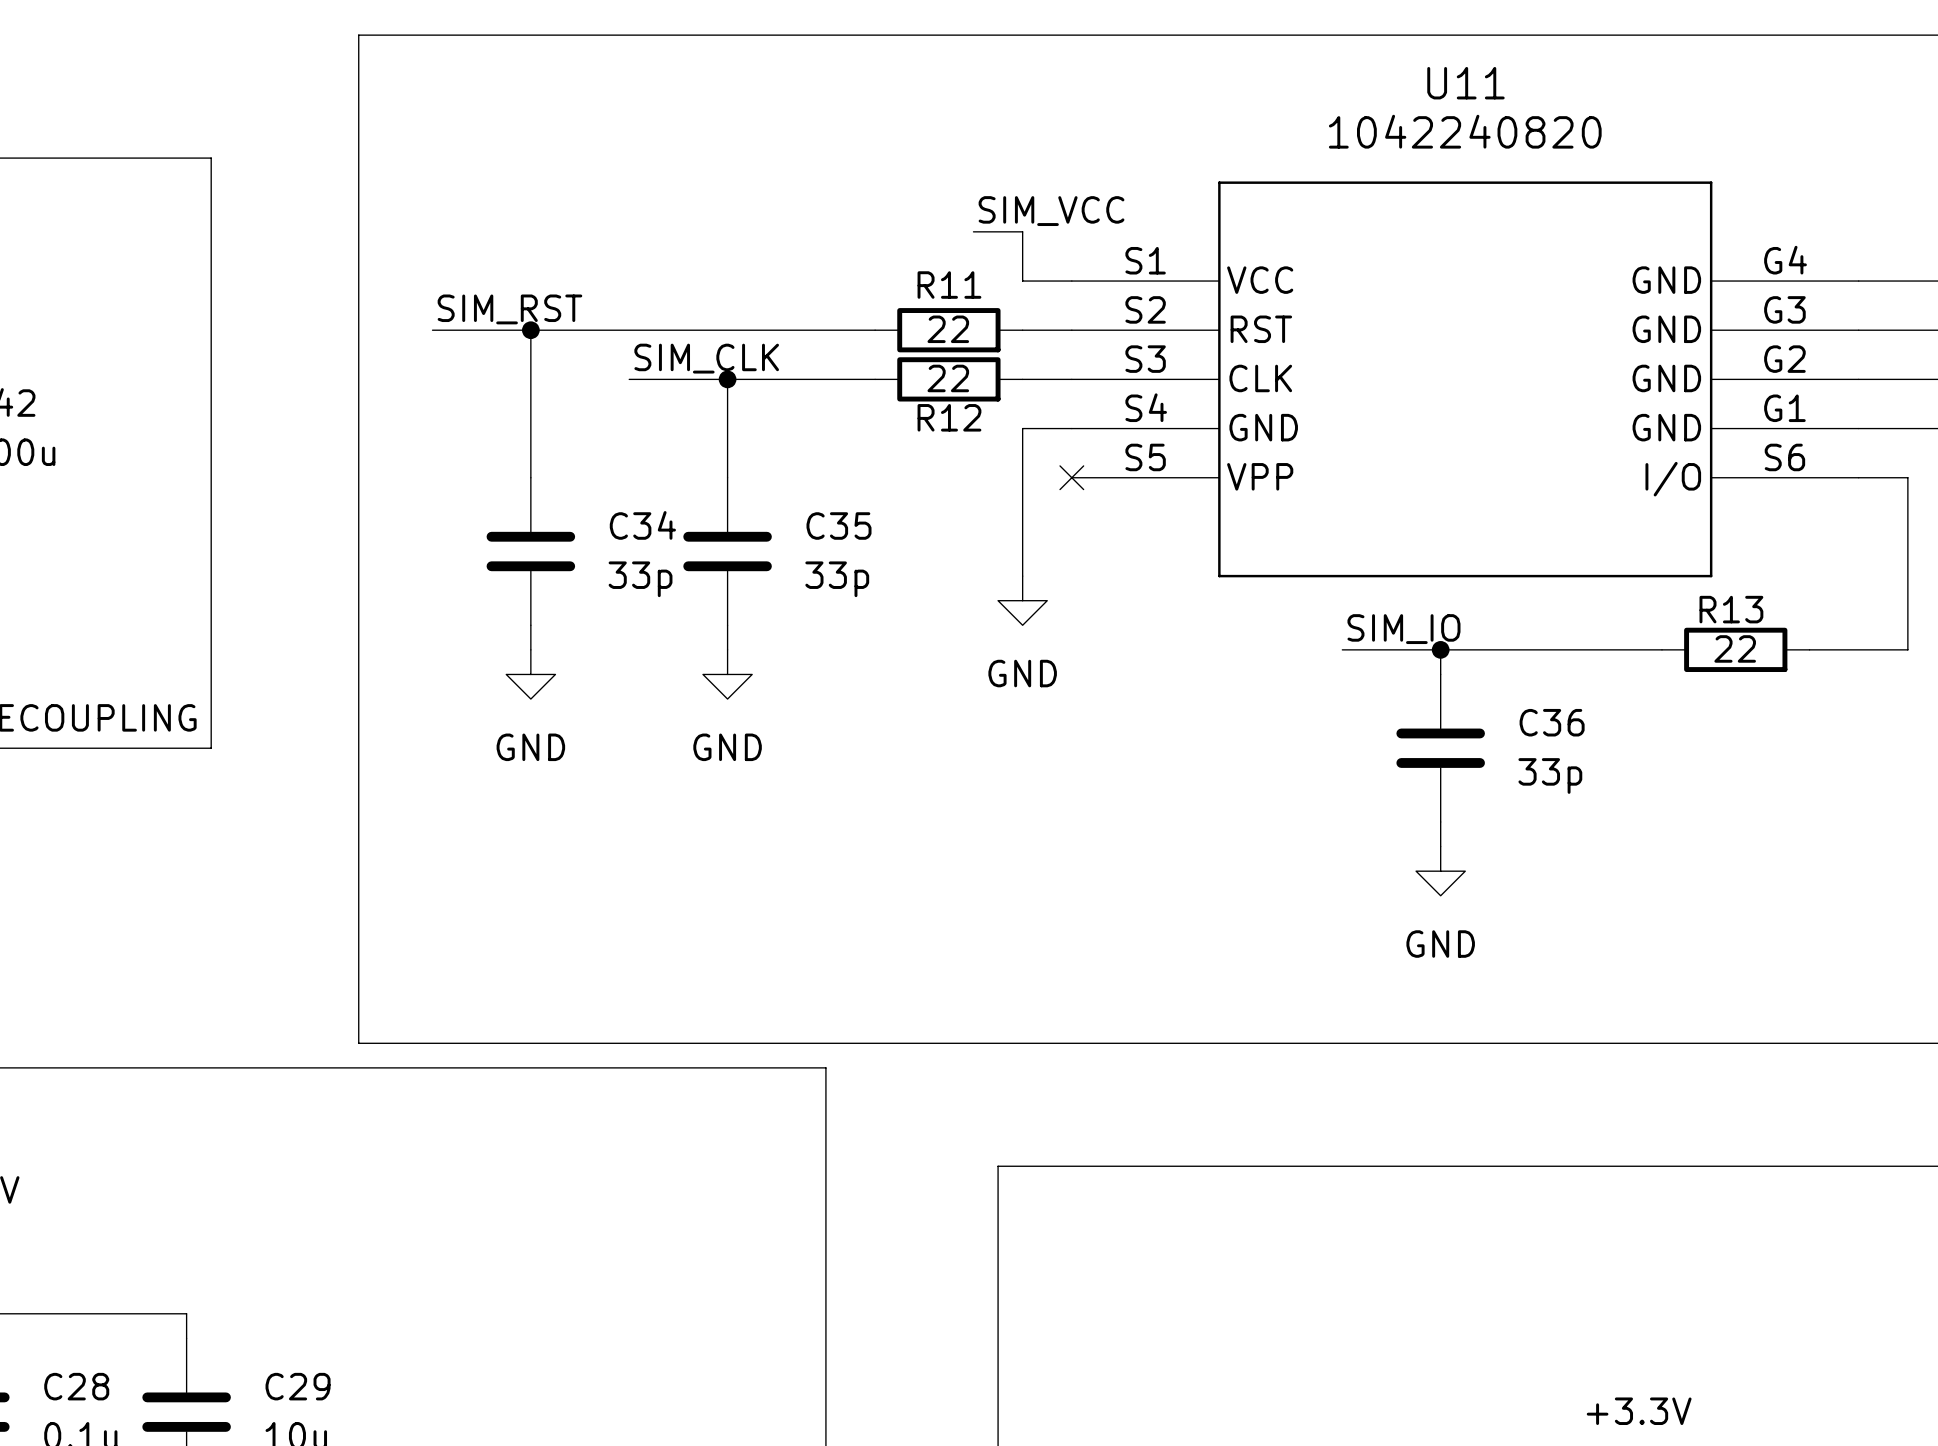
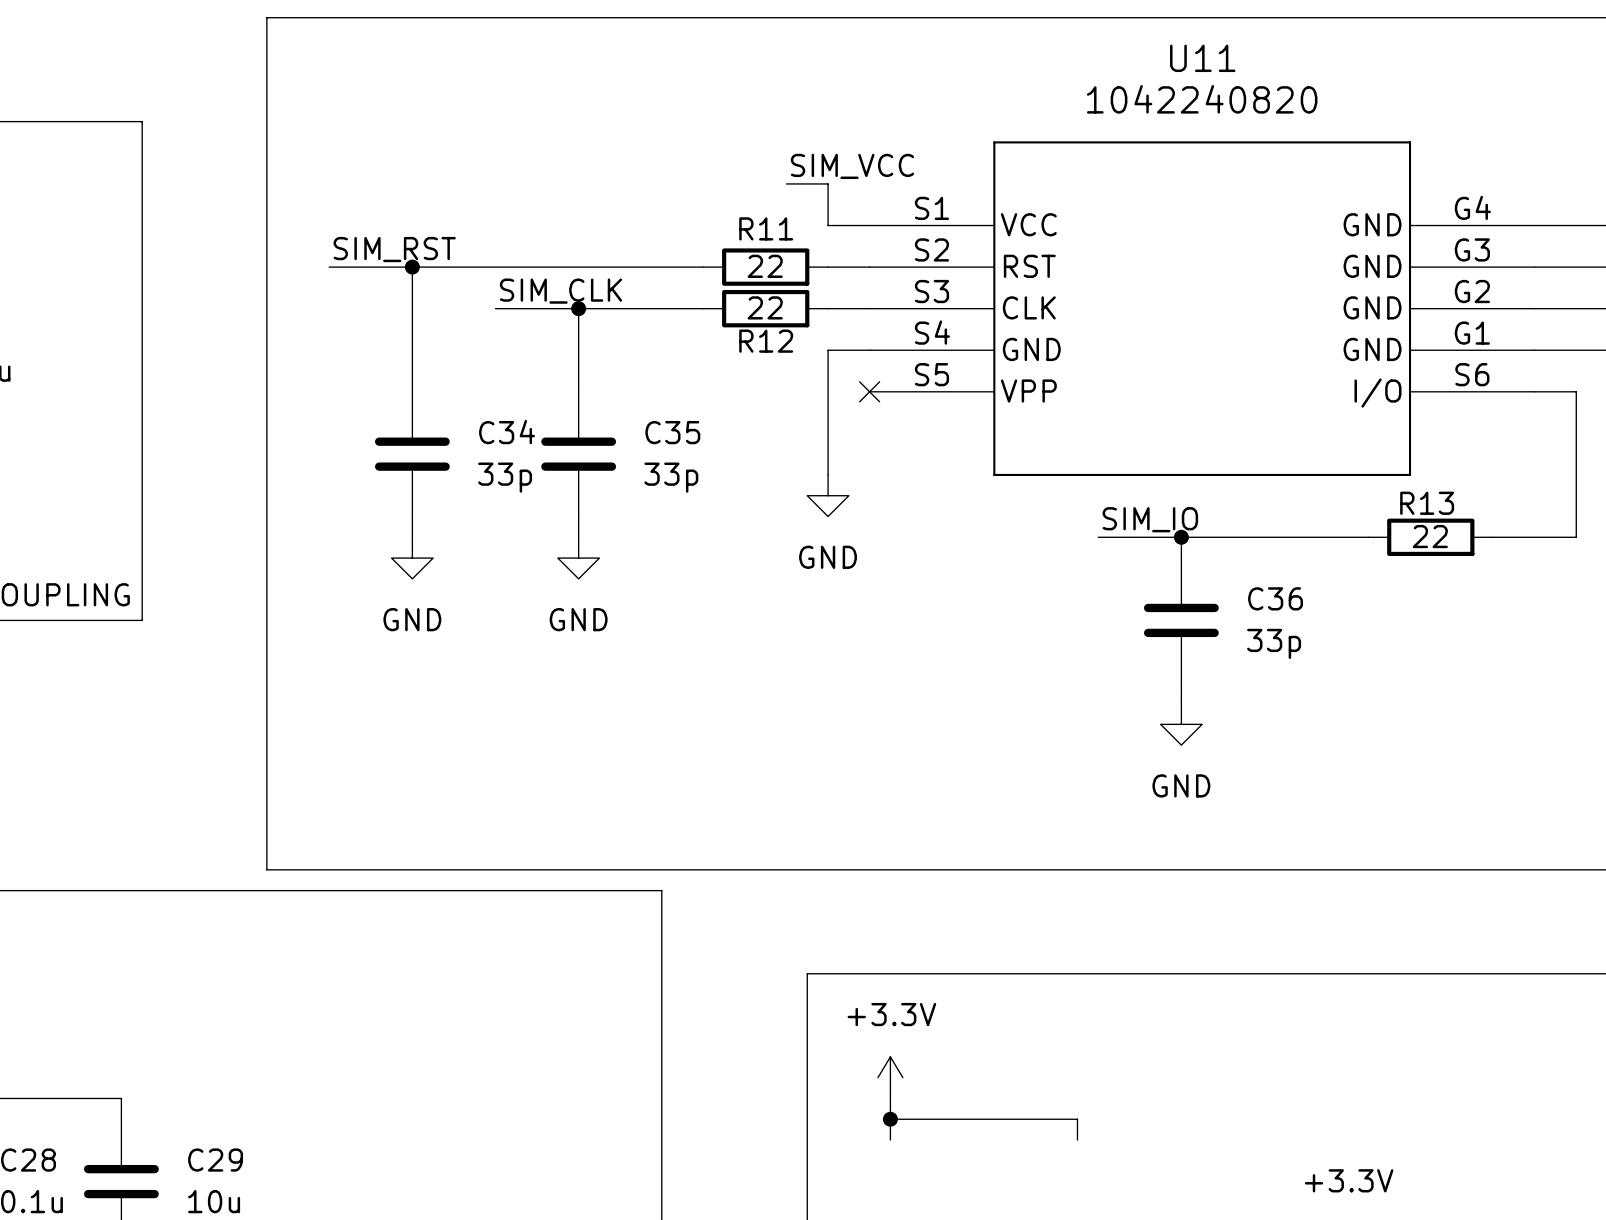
power symbol: none -> +3.3V (890, 1077)
wire: none -> (890, 1098) (890, 1140)
wire: none -> (890, 1119) (1077, 1119) (1077, 1140)
junction: none -> (890, 1119)

